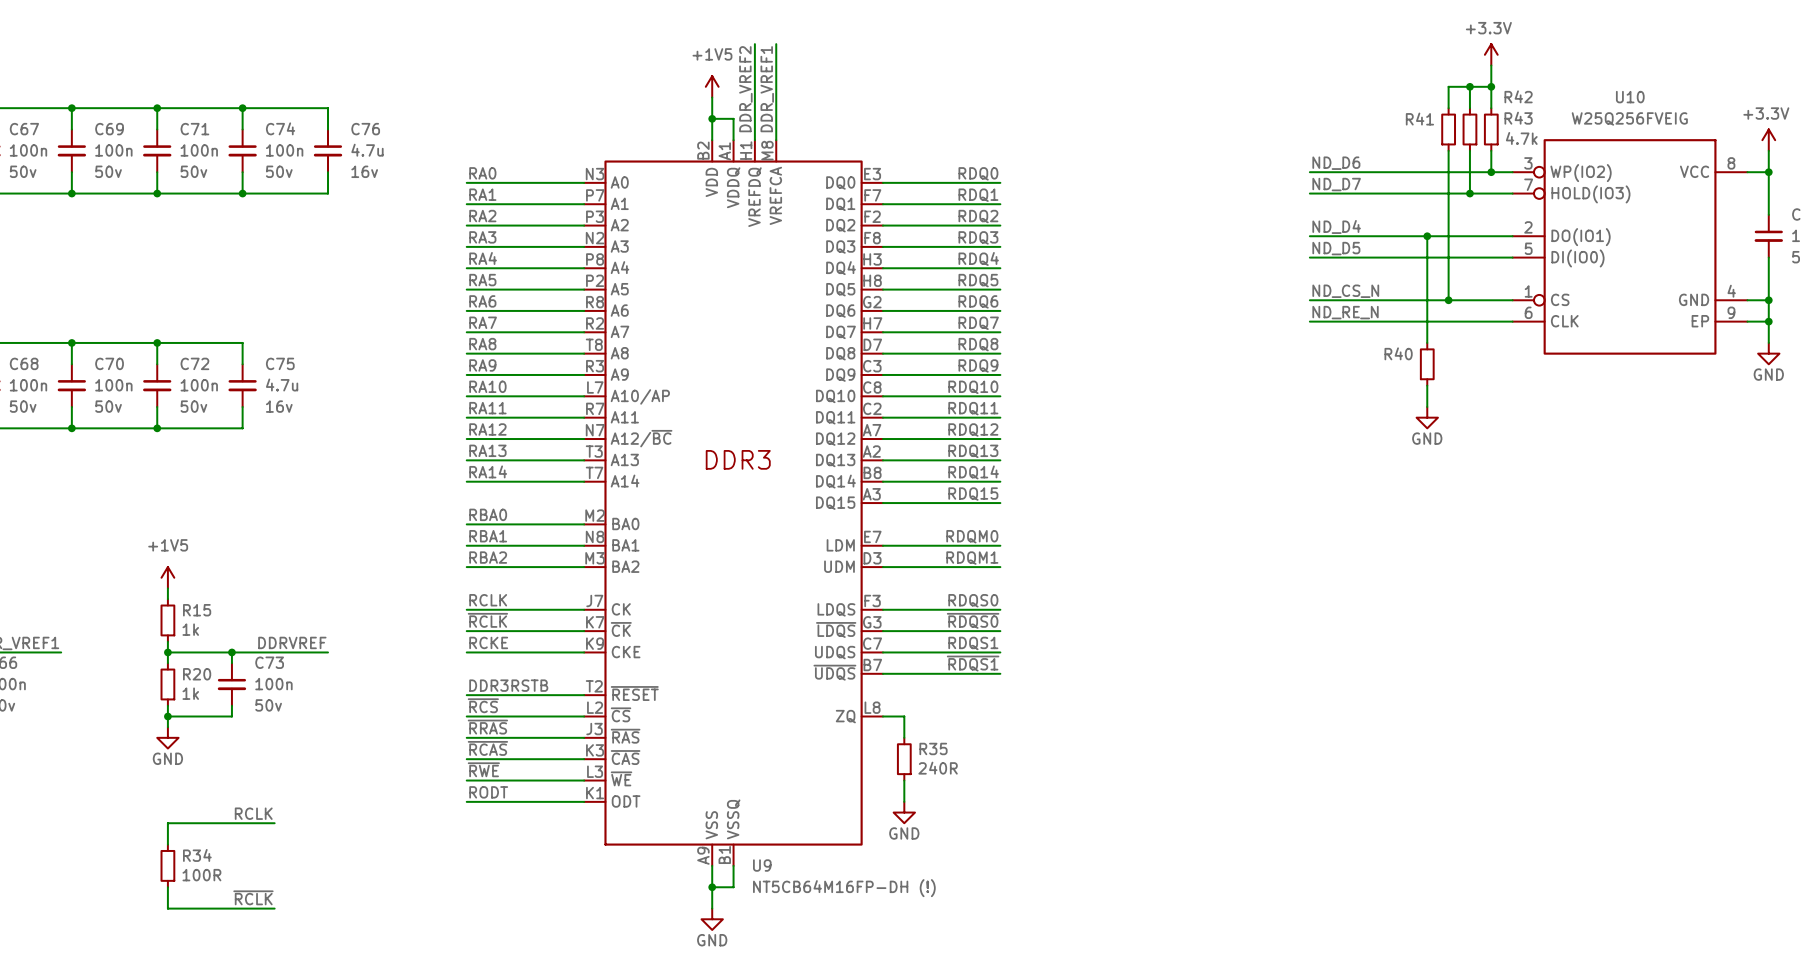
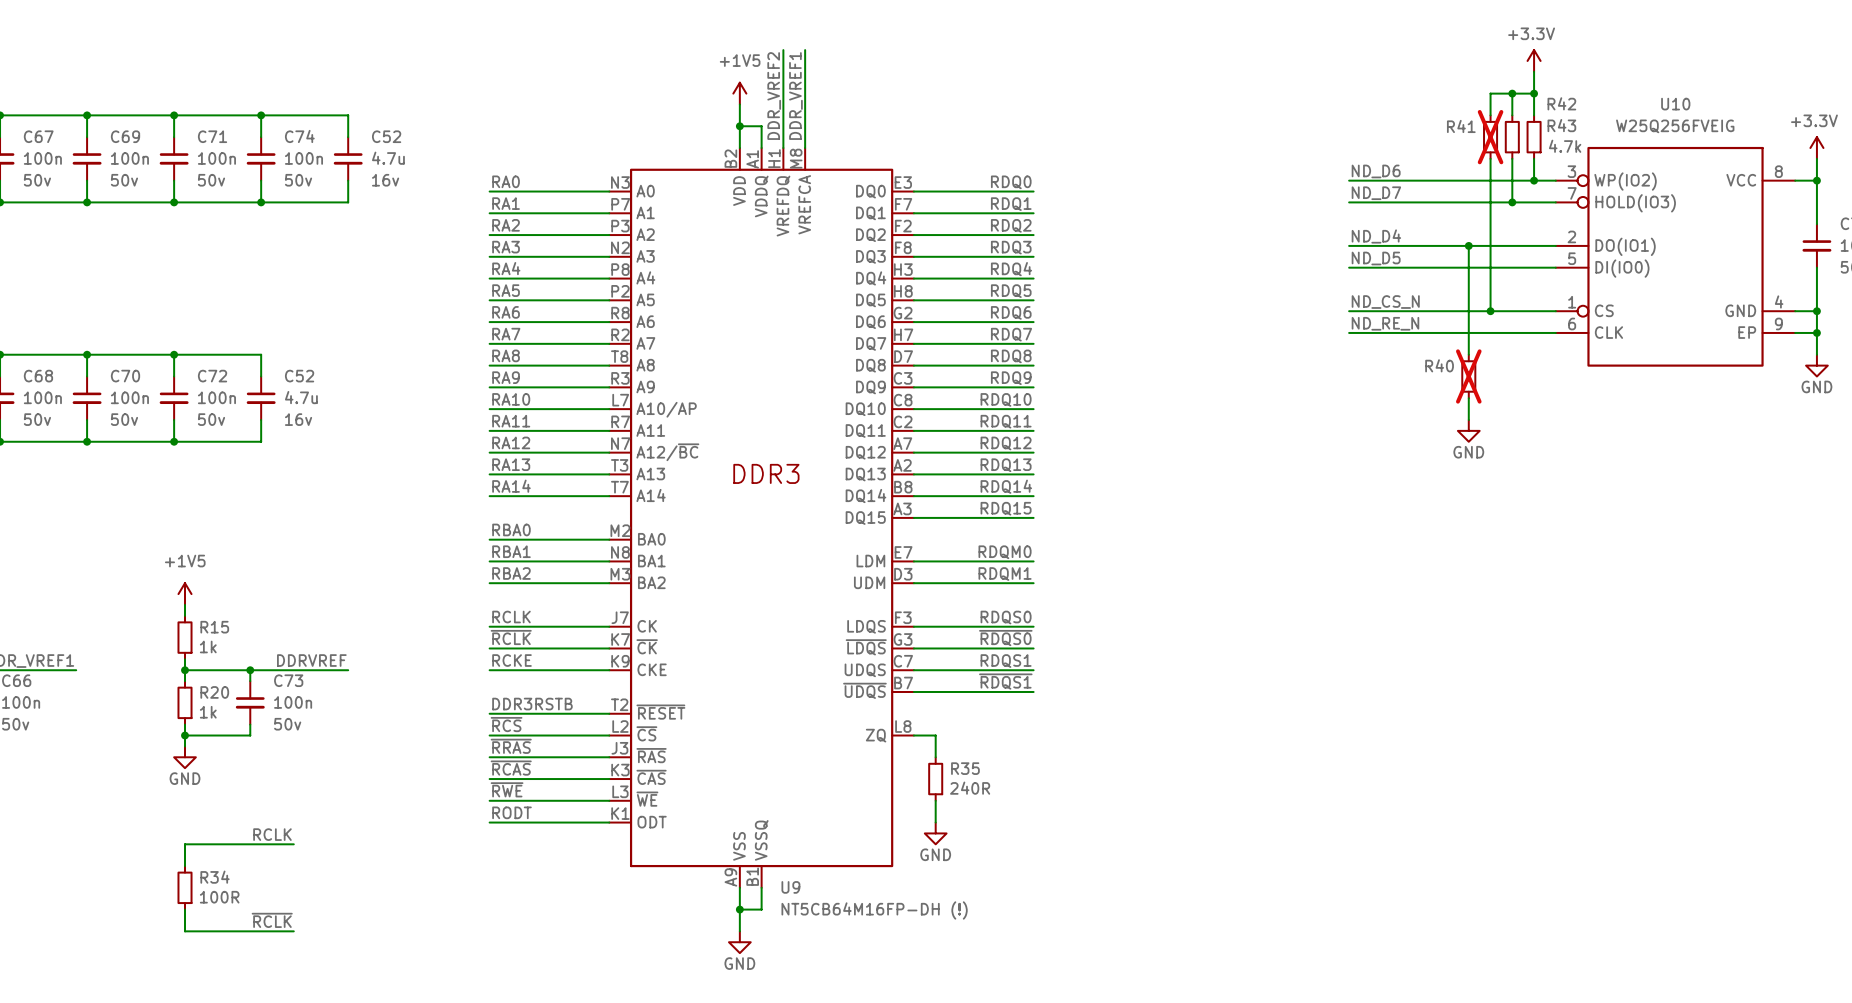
C76 name: C76 (365, 129) -> C52 (386, 136)
R41 do-not-place cross: none -> (1490, 137)
C75 name: C75 (280, 363) -> C52 (299, 376)
R40 do-not-place cross: none -> (1468, 376)

